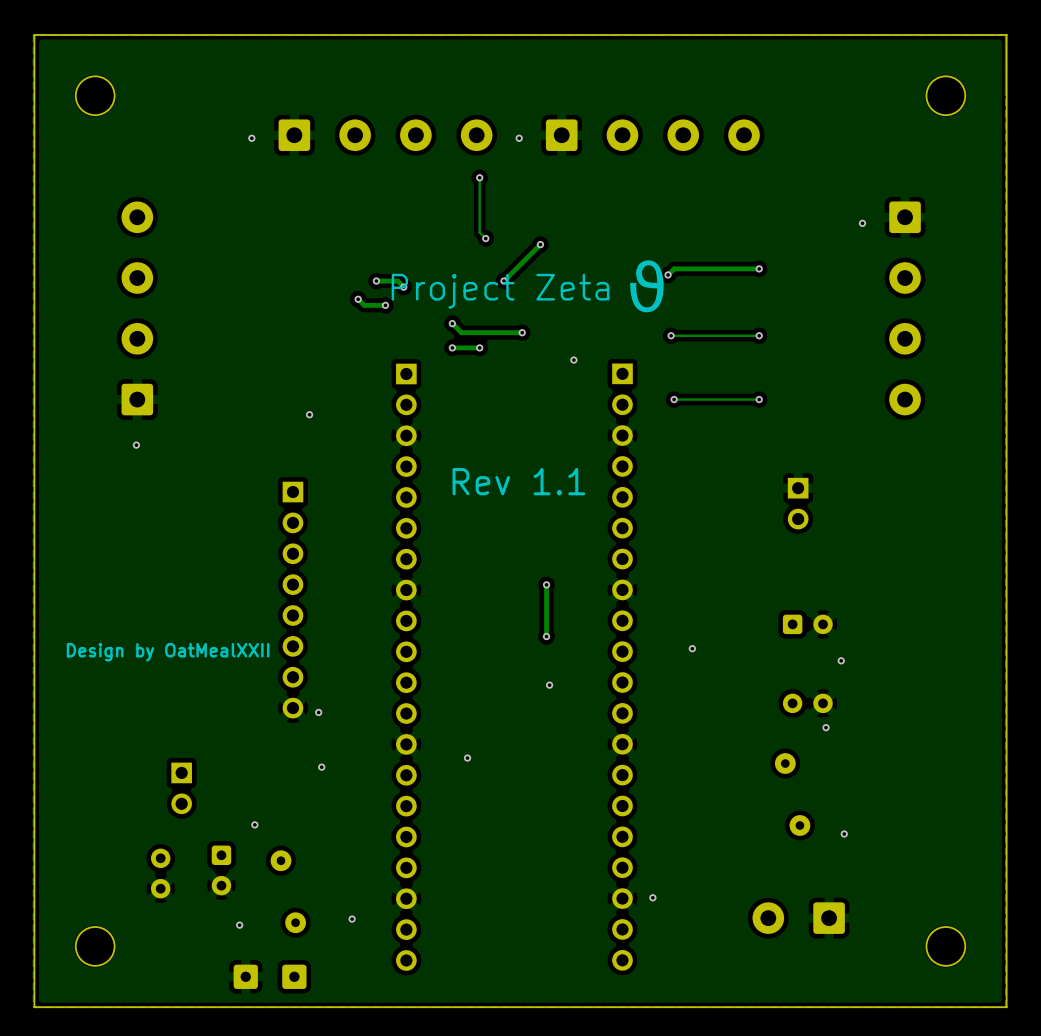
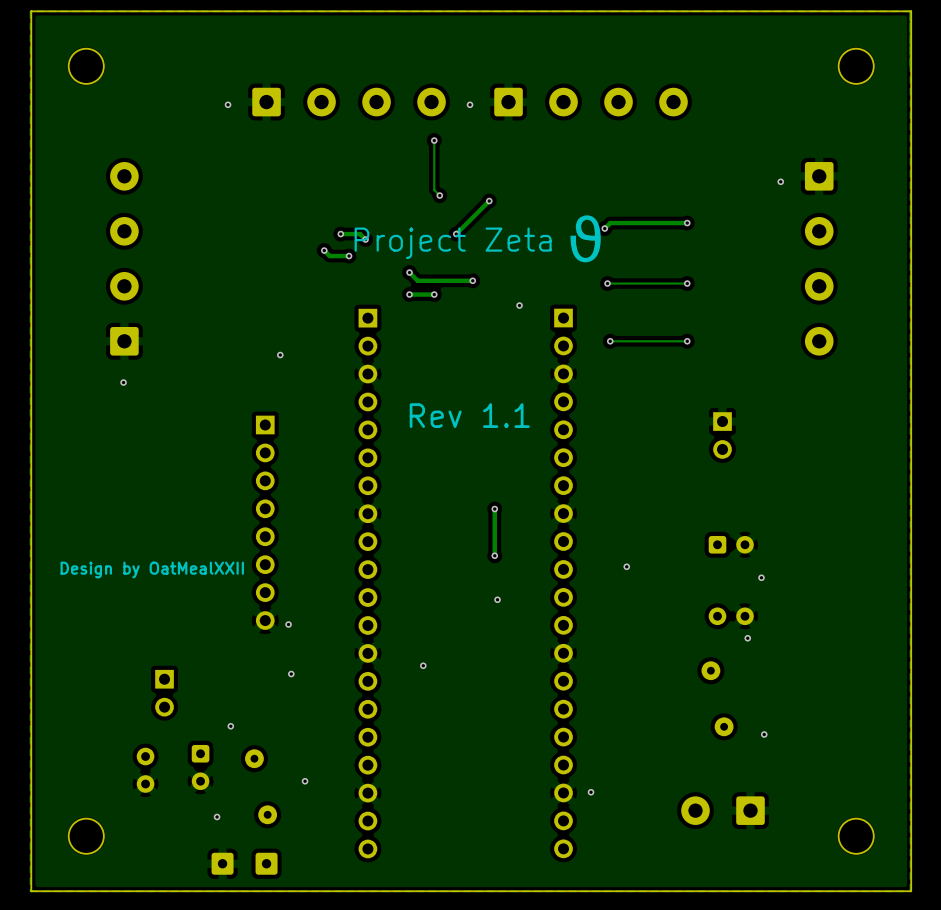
via position: (352, 919) -> (305, 781)

